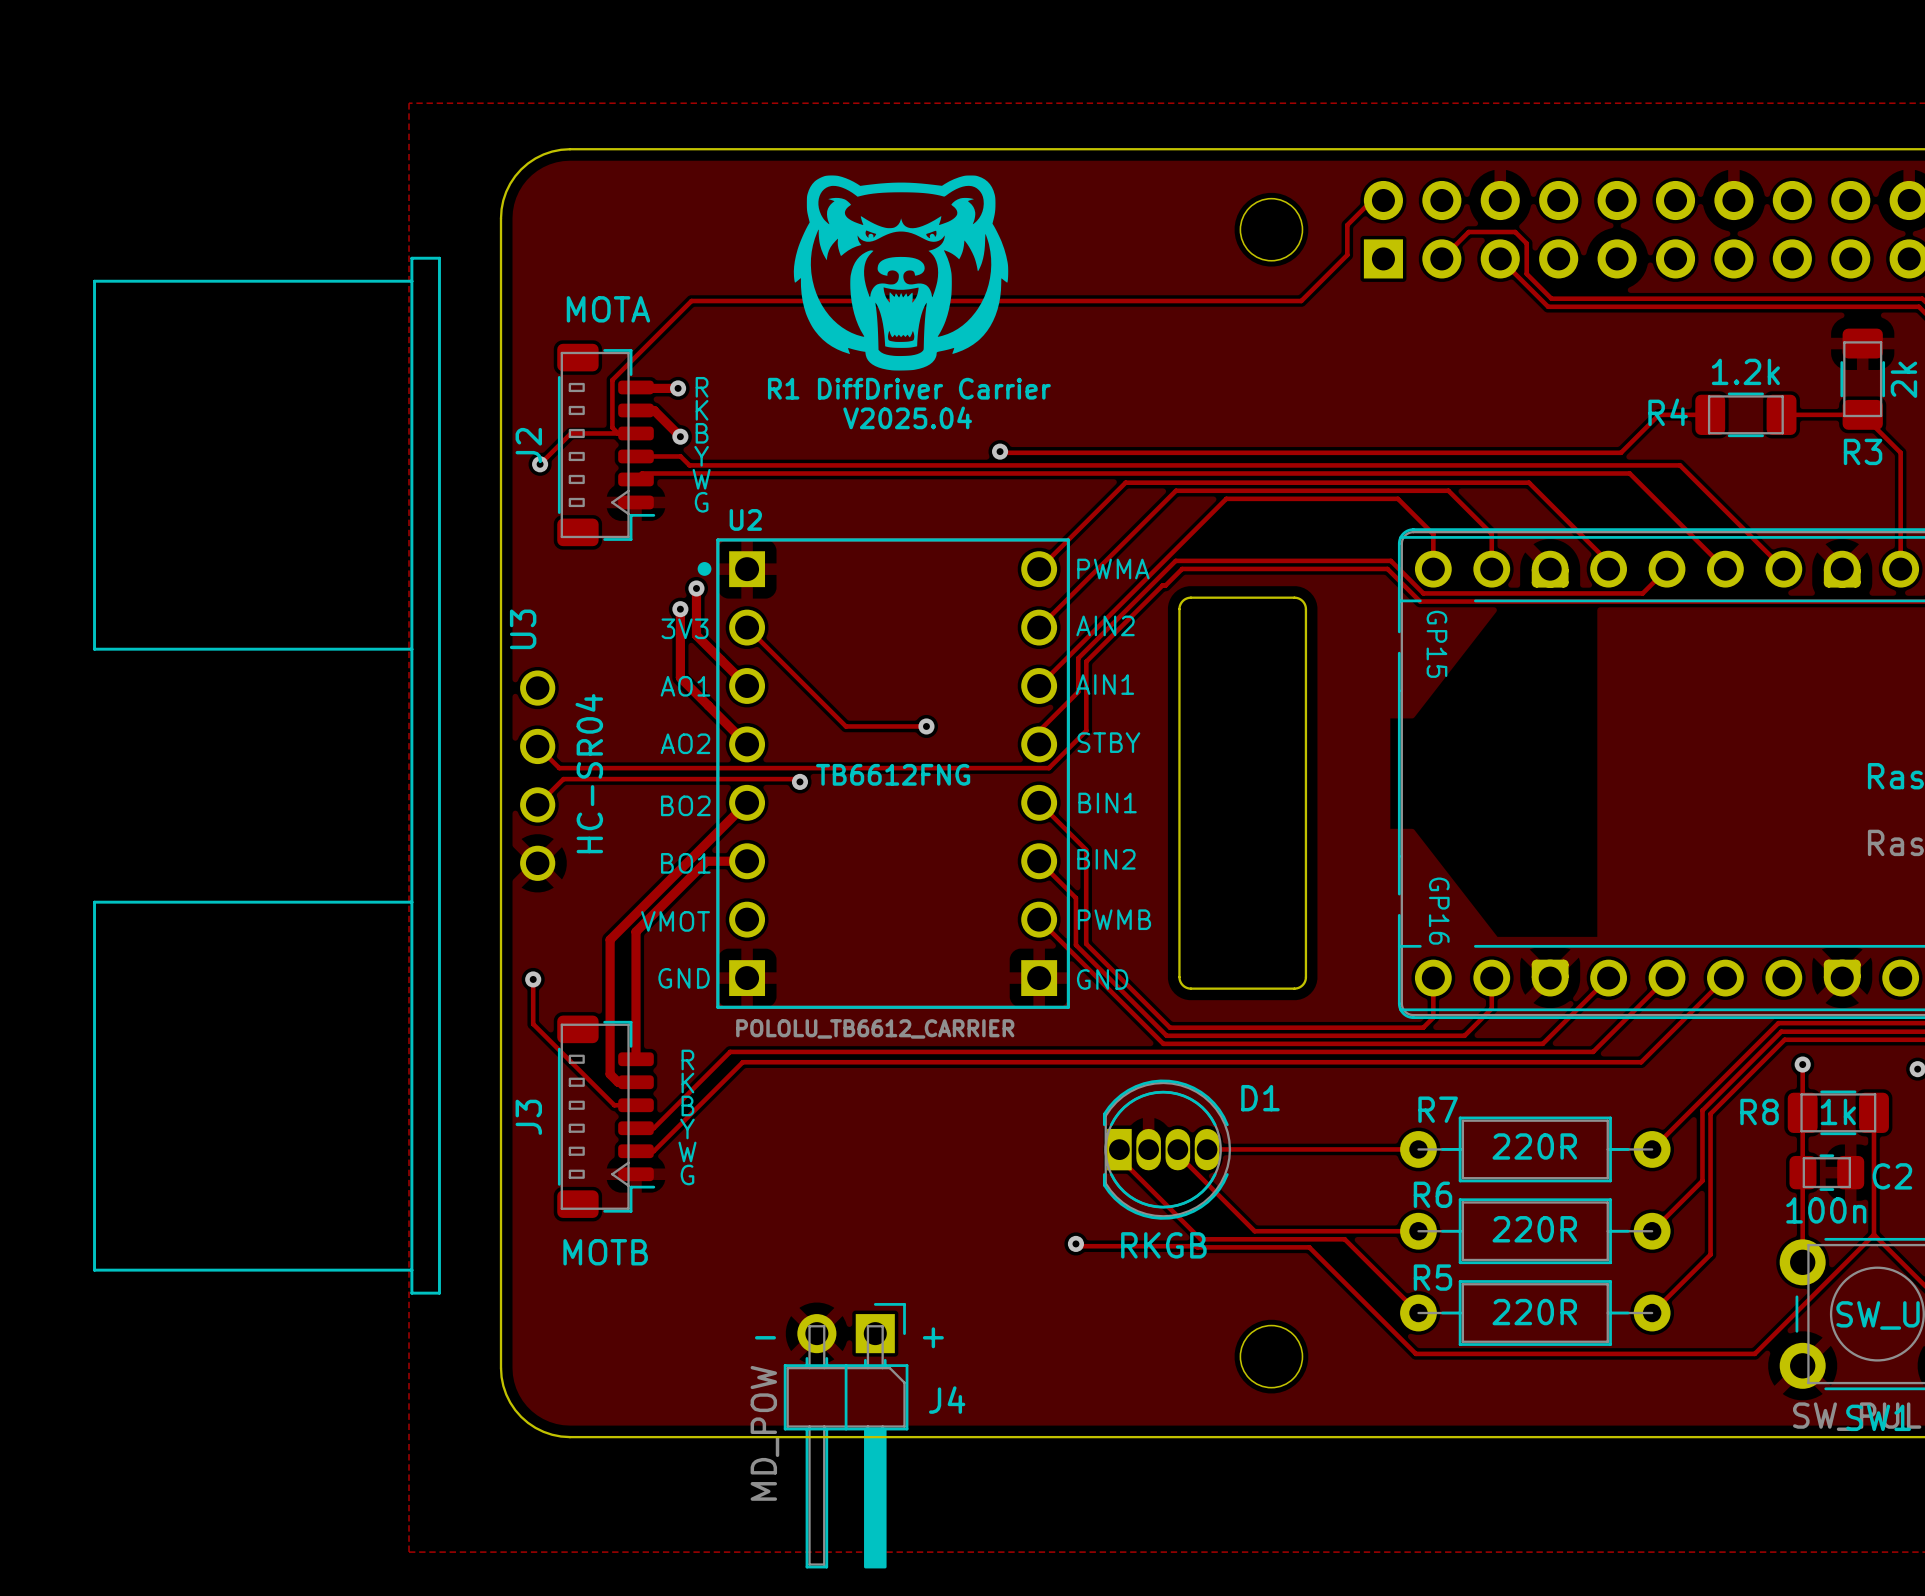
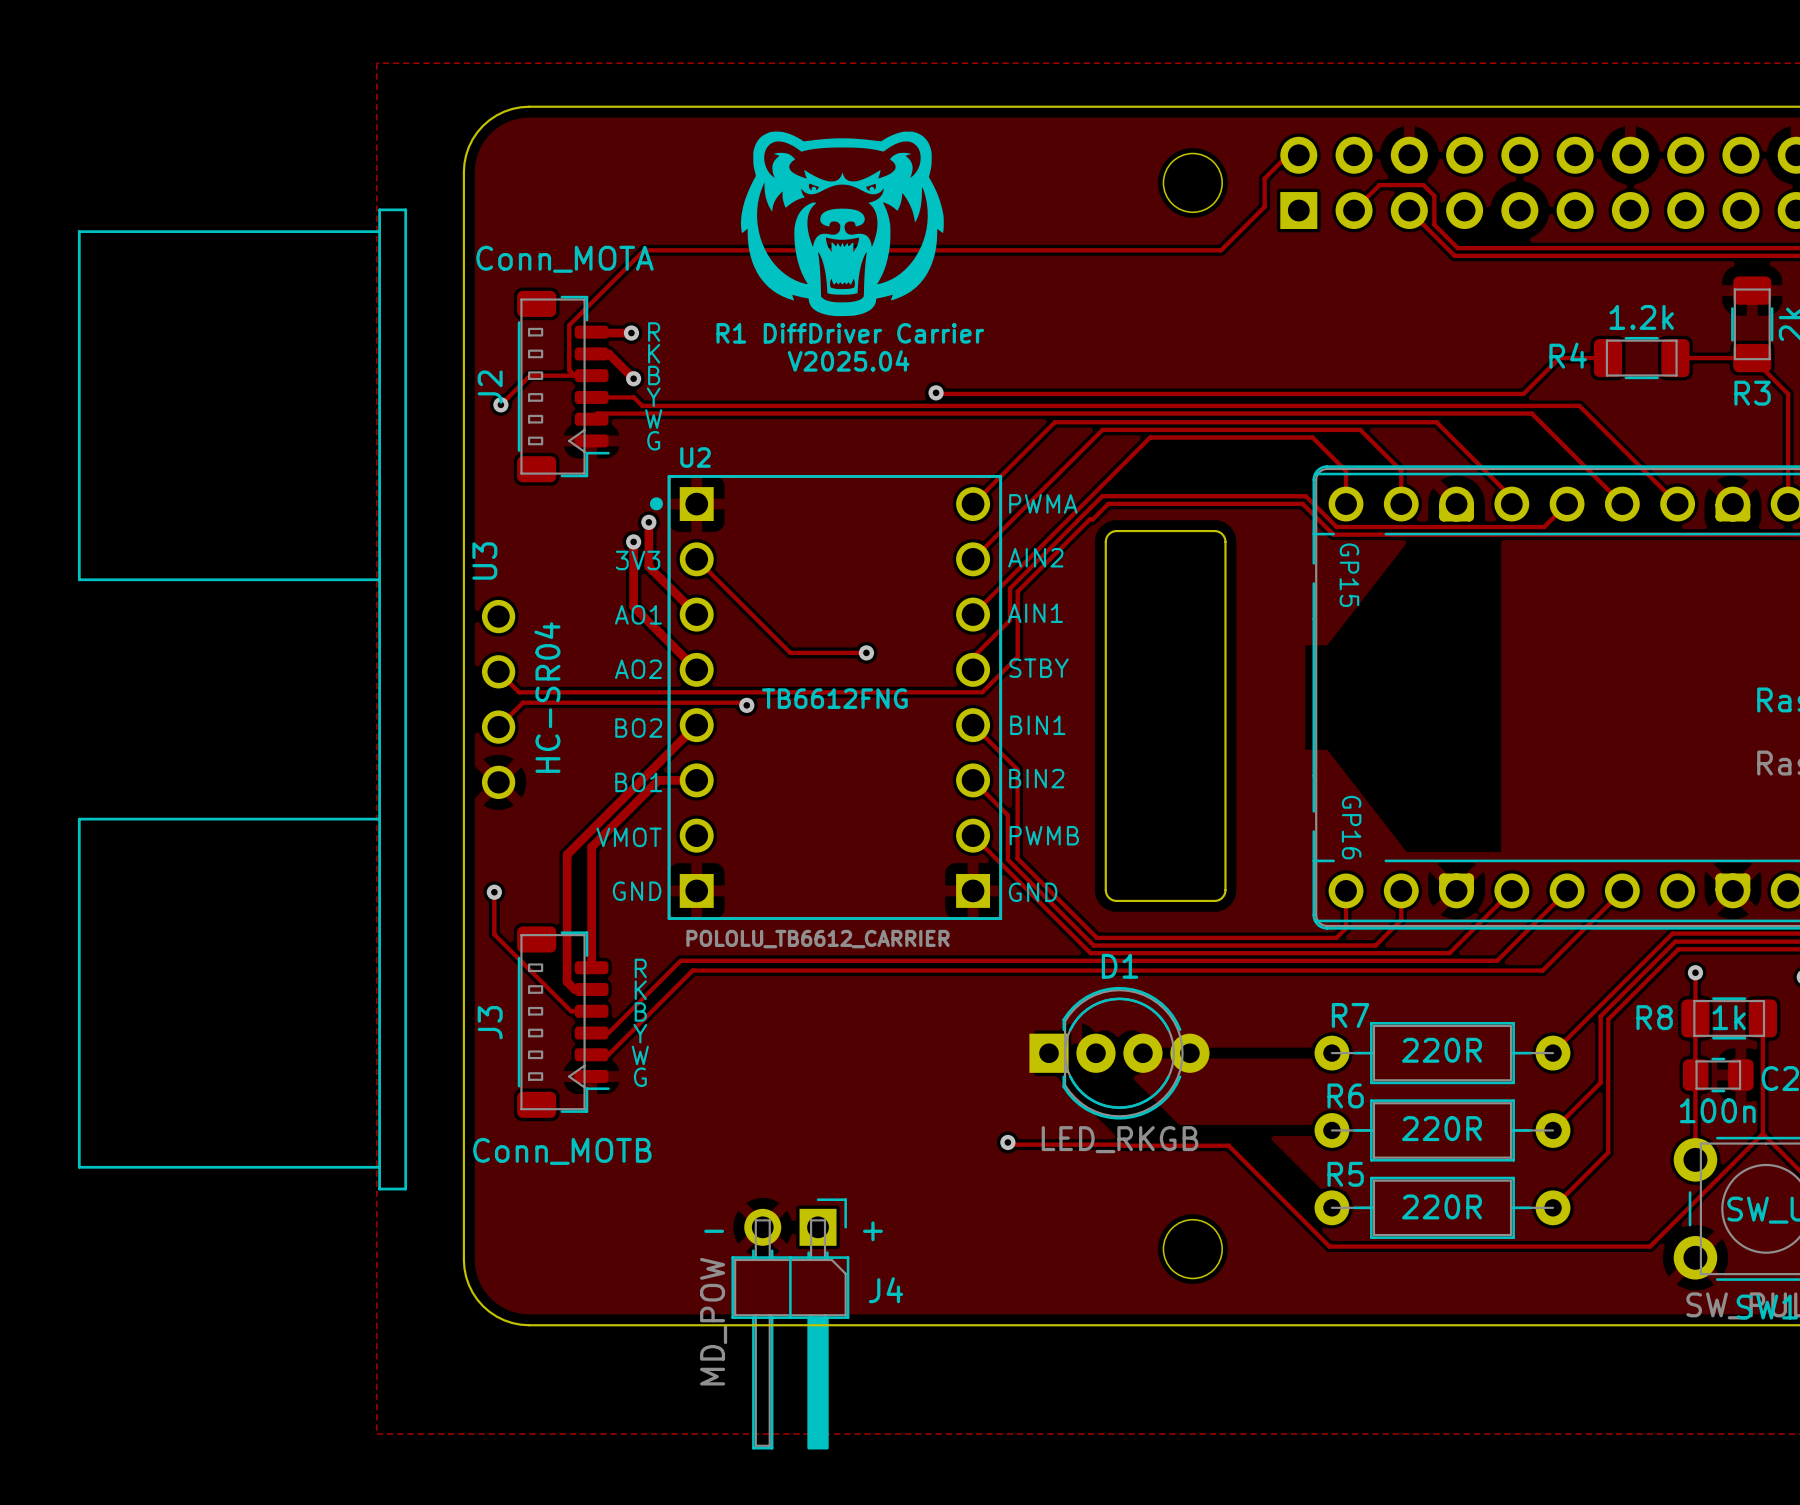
J2 value: MOTA (608, 309) -> Conn_MOTA (565, 259)
D1 footprint: [1102, 1079, 1232, 1220] -> [1029, 986, 1210, 1120]
D1 name position: D1 (1260, 1098) -> D1 (1119, 966)
track: (1209, 1149) (1418, 1149) -> none
track: (1177, 1154) (1254, 1231) (1418, 1231) -> none
track: (1119, 1158) (1200, 1239) (1344, 1239) (1418, 1313) -> none
D1 value: RKGB (1163, 1245) -> LED_RKGB (1119, 1139)
J3 value: MOTB (605, 1252) -> Conn_MOTB (562, 1151)

